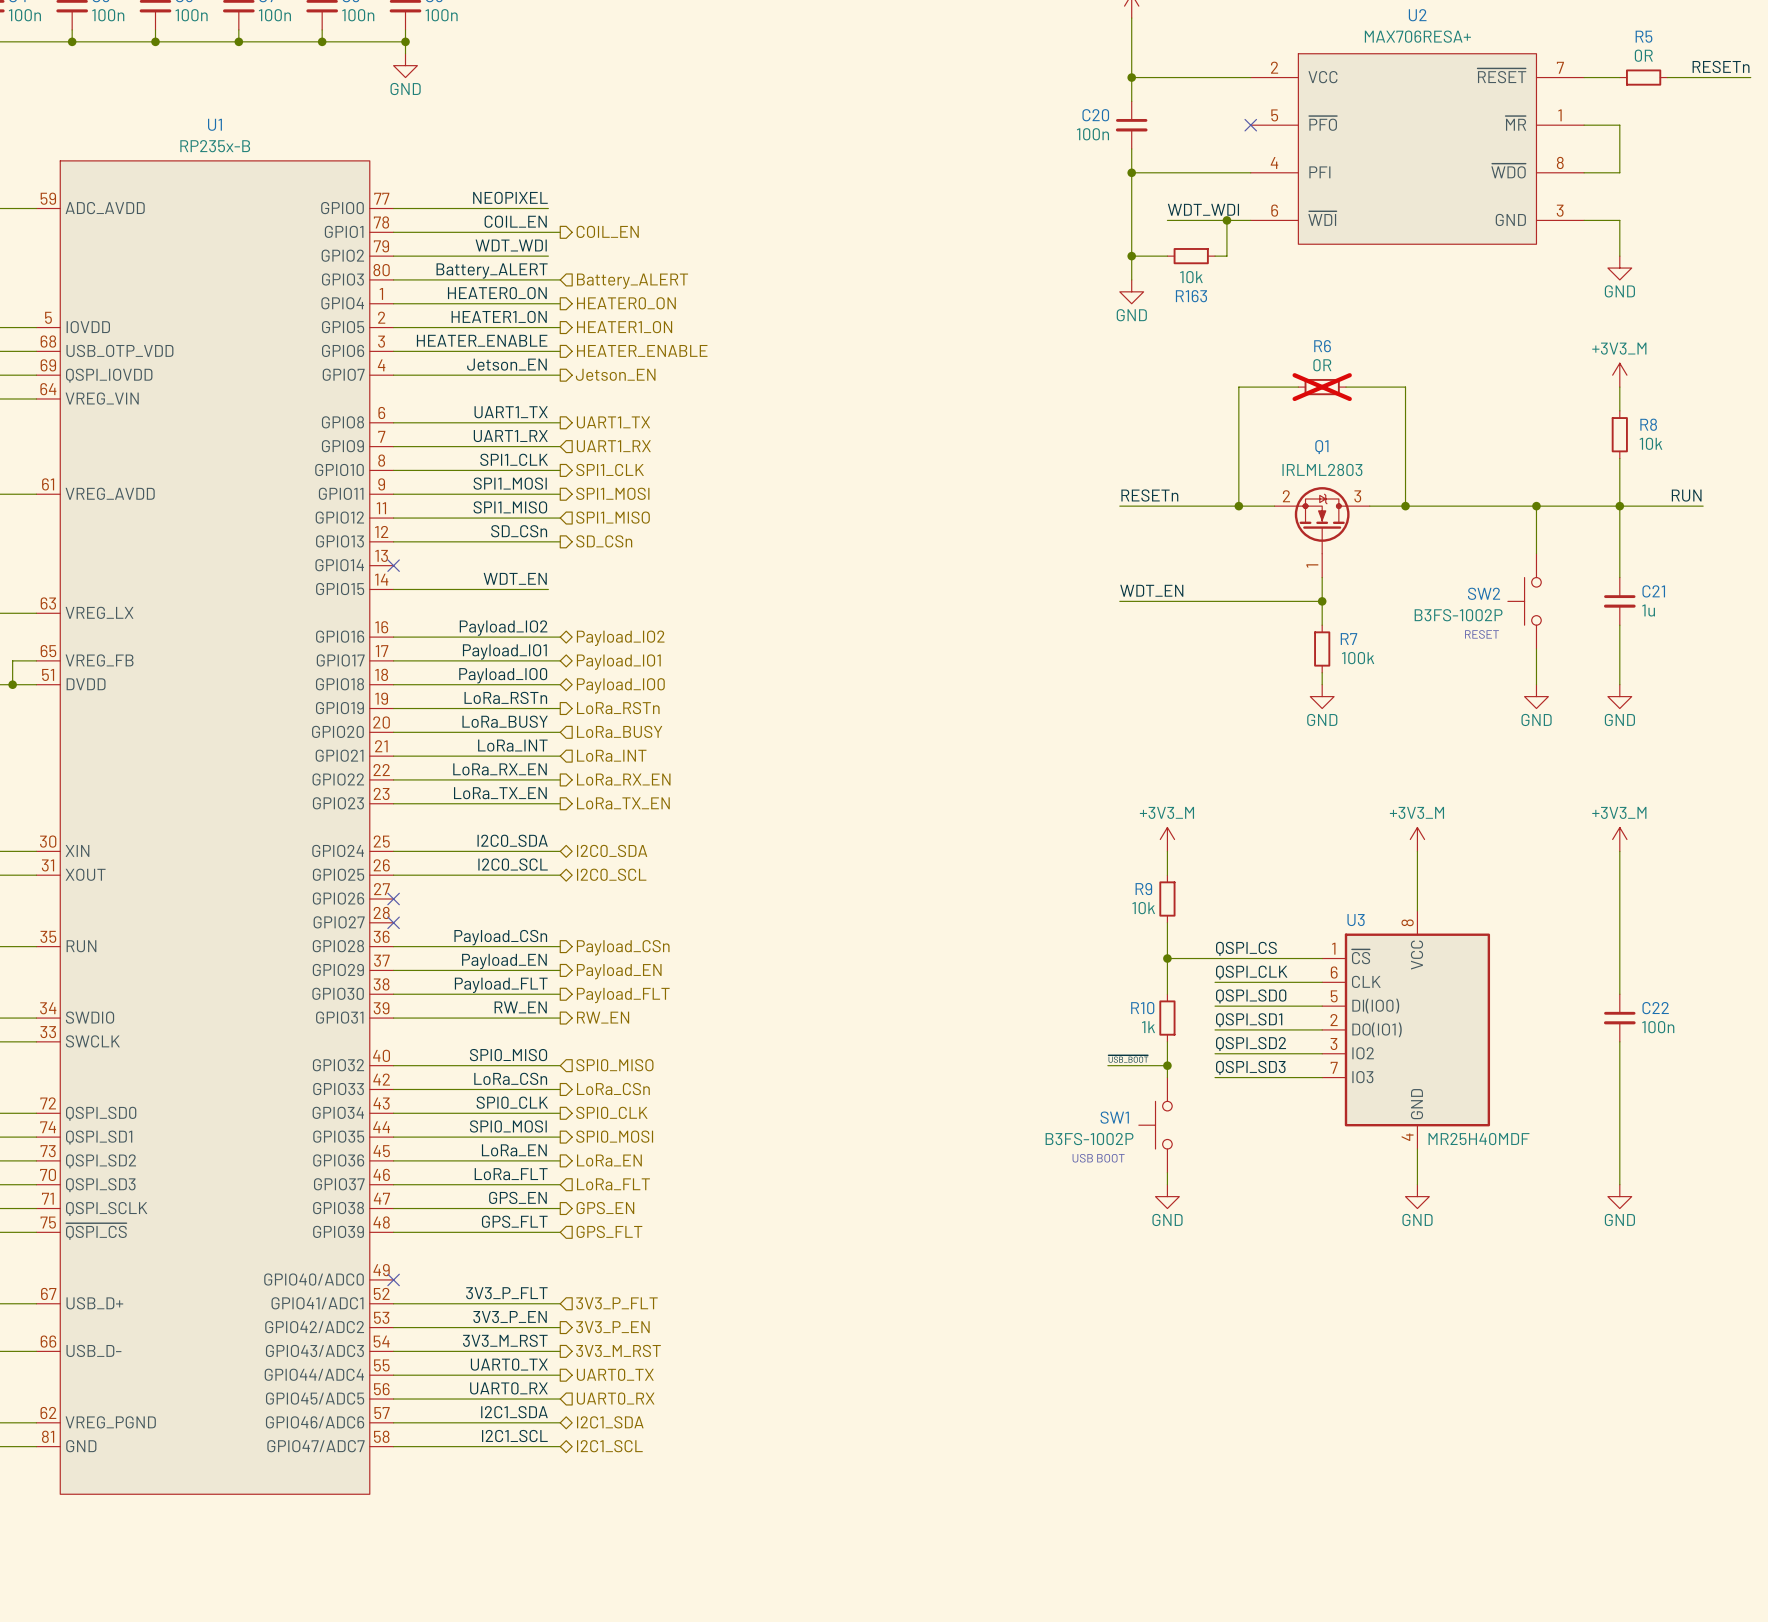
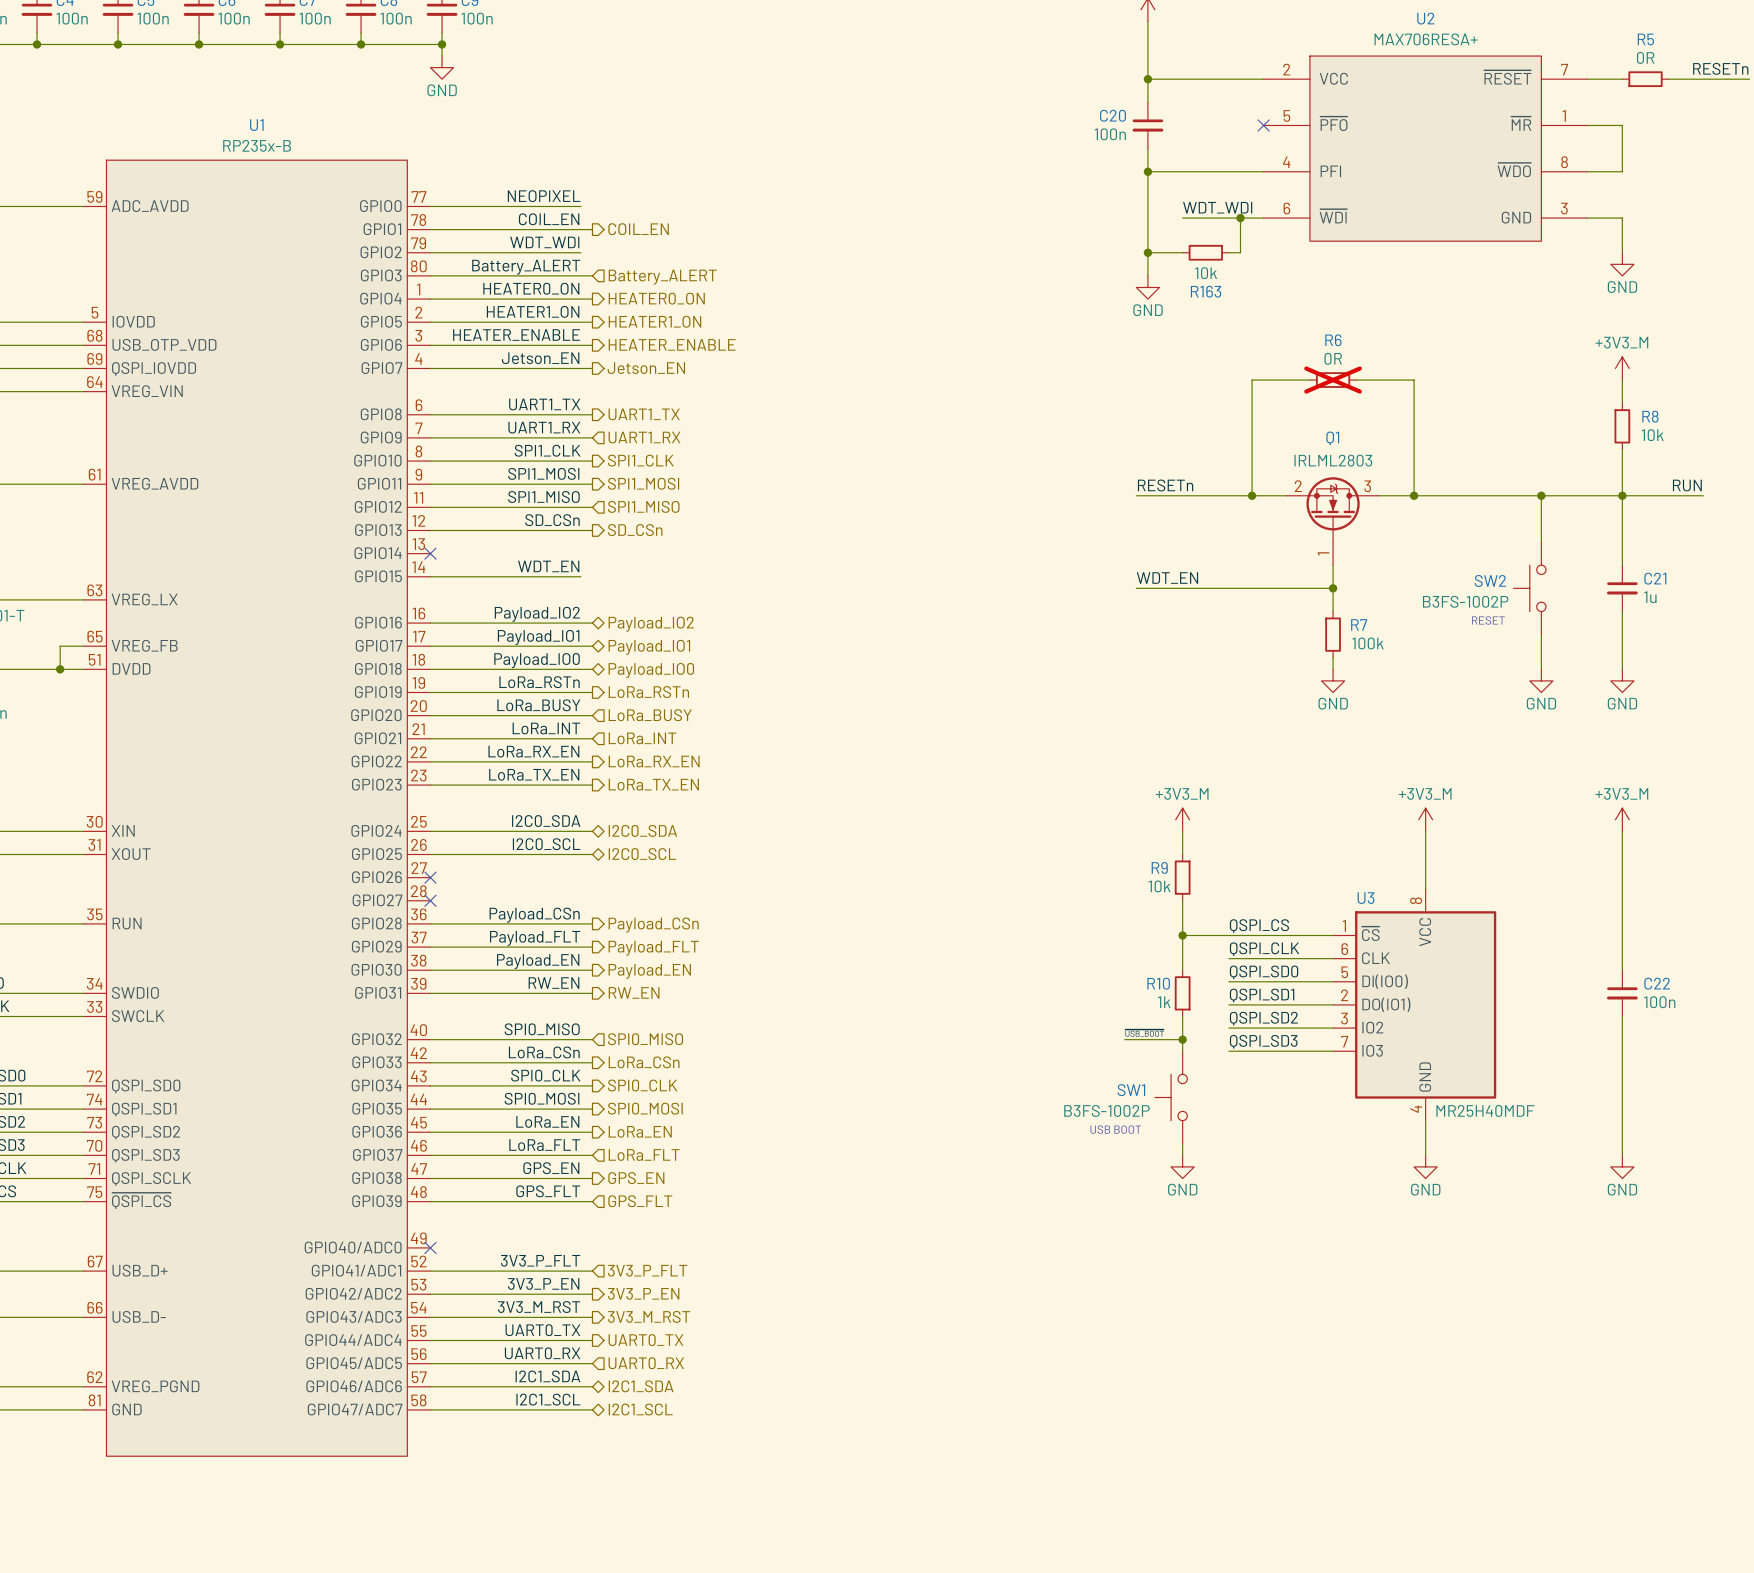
label: Payload_EN (504, 961) -> Payload_FLT (535, 938)
hierarchical label: Payload_EN (619, 971) -> Payload_FLT (653, 948)
label: Payload_FLT (501, 985) -> Payload_EN (538, 961)
hierarchical label: Payload_FLT (623, 995) -> Payload_EN (649, 971)

